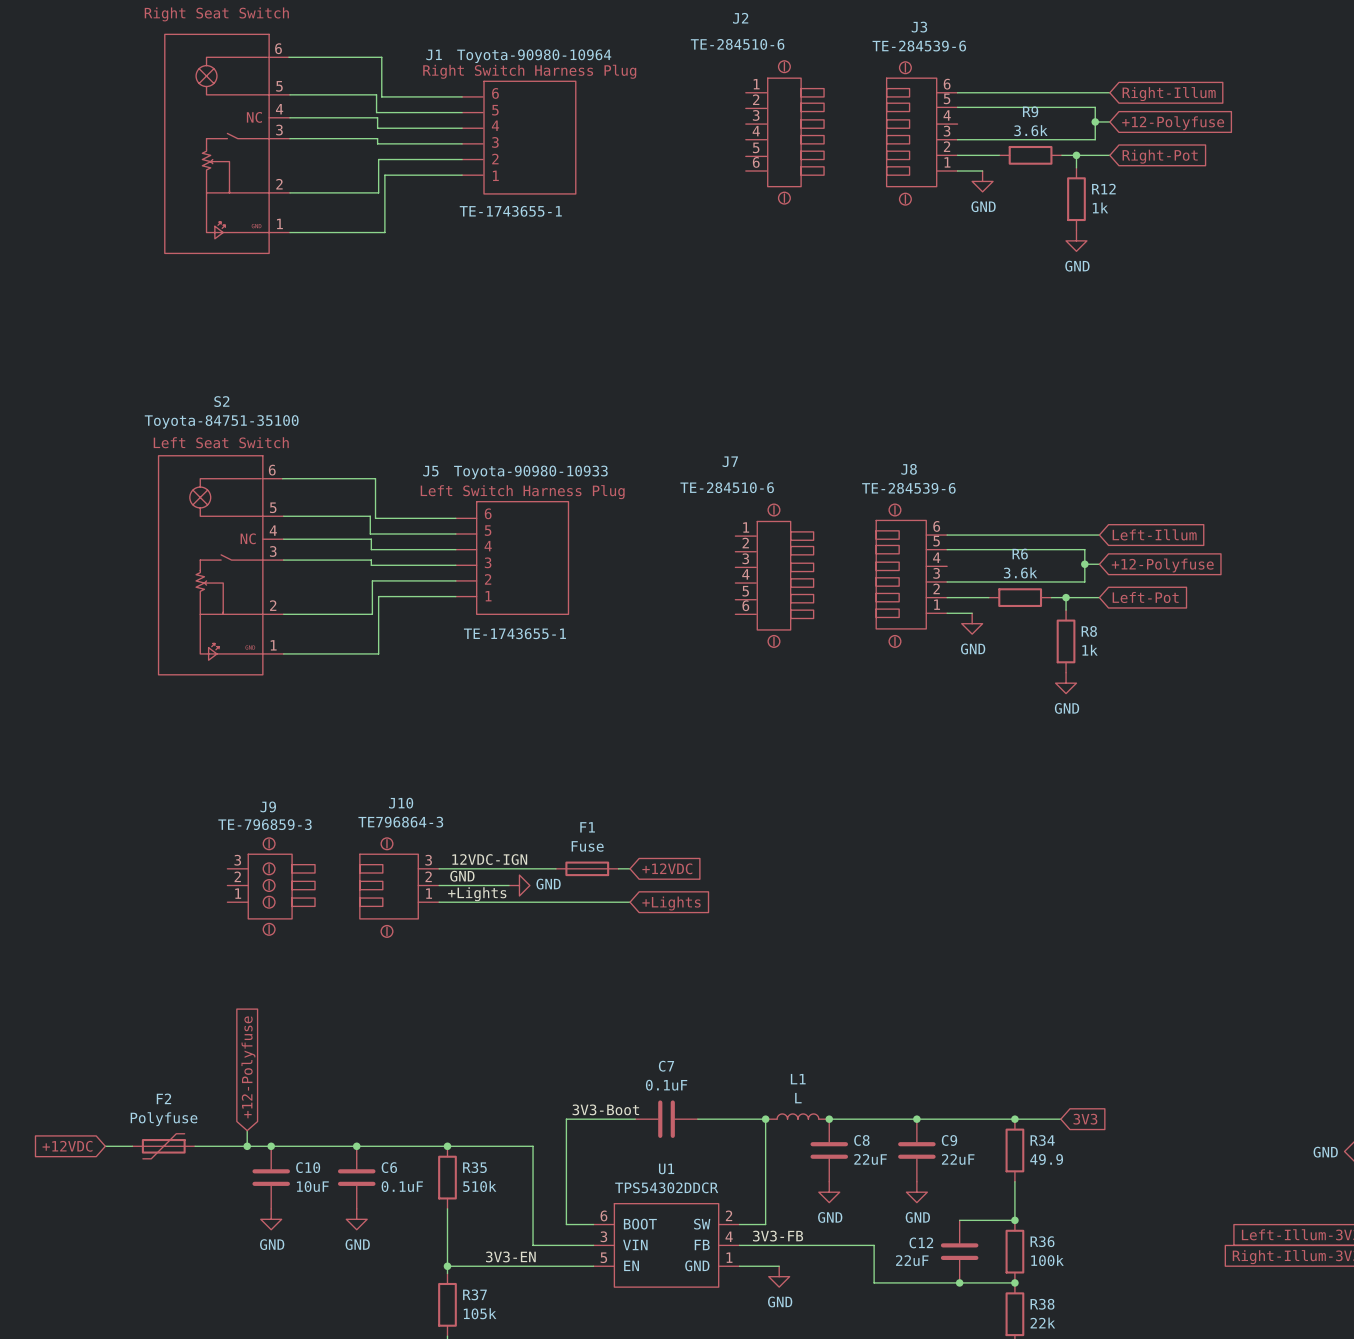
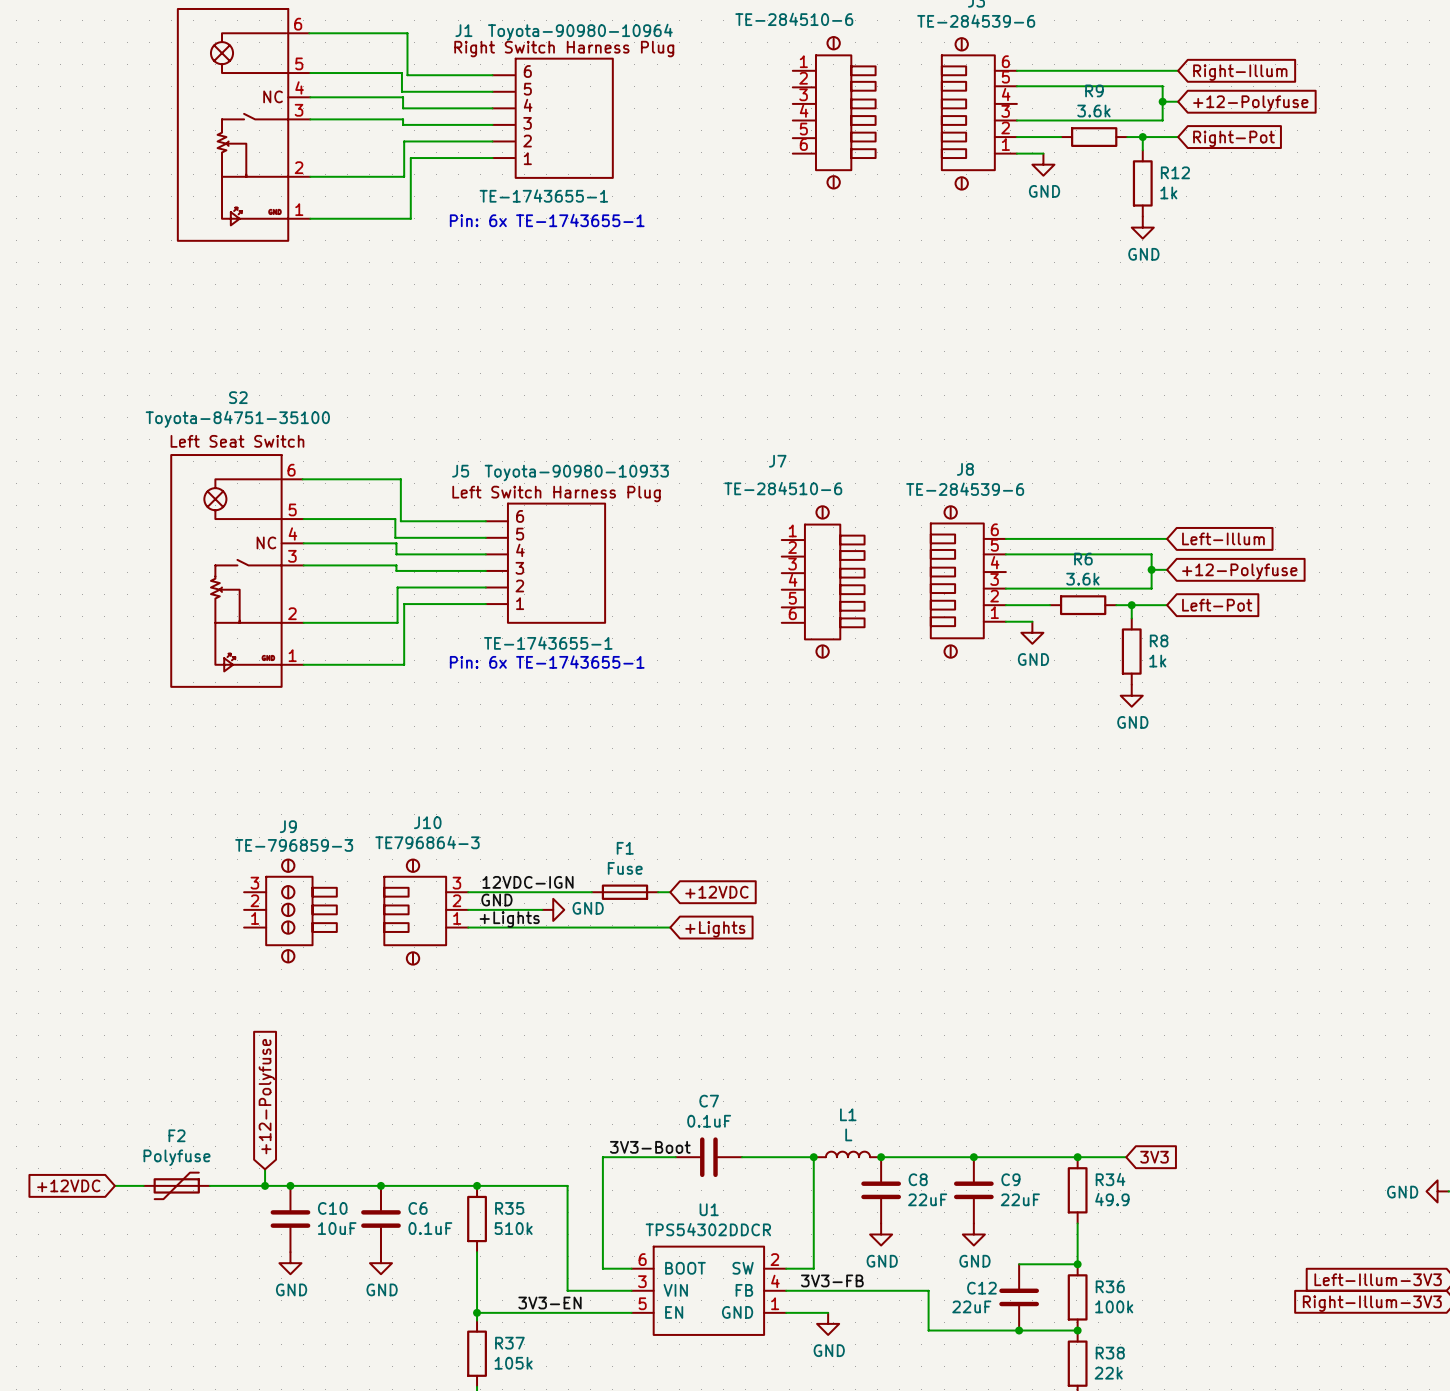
text: none -> Pin: 6x TE-1743655-1 (547, 220)
text: none -> Pin: 6x TE-1743655-1 (547, 662)

